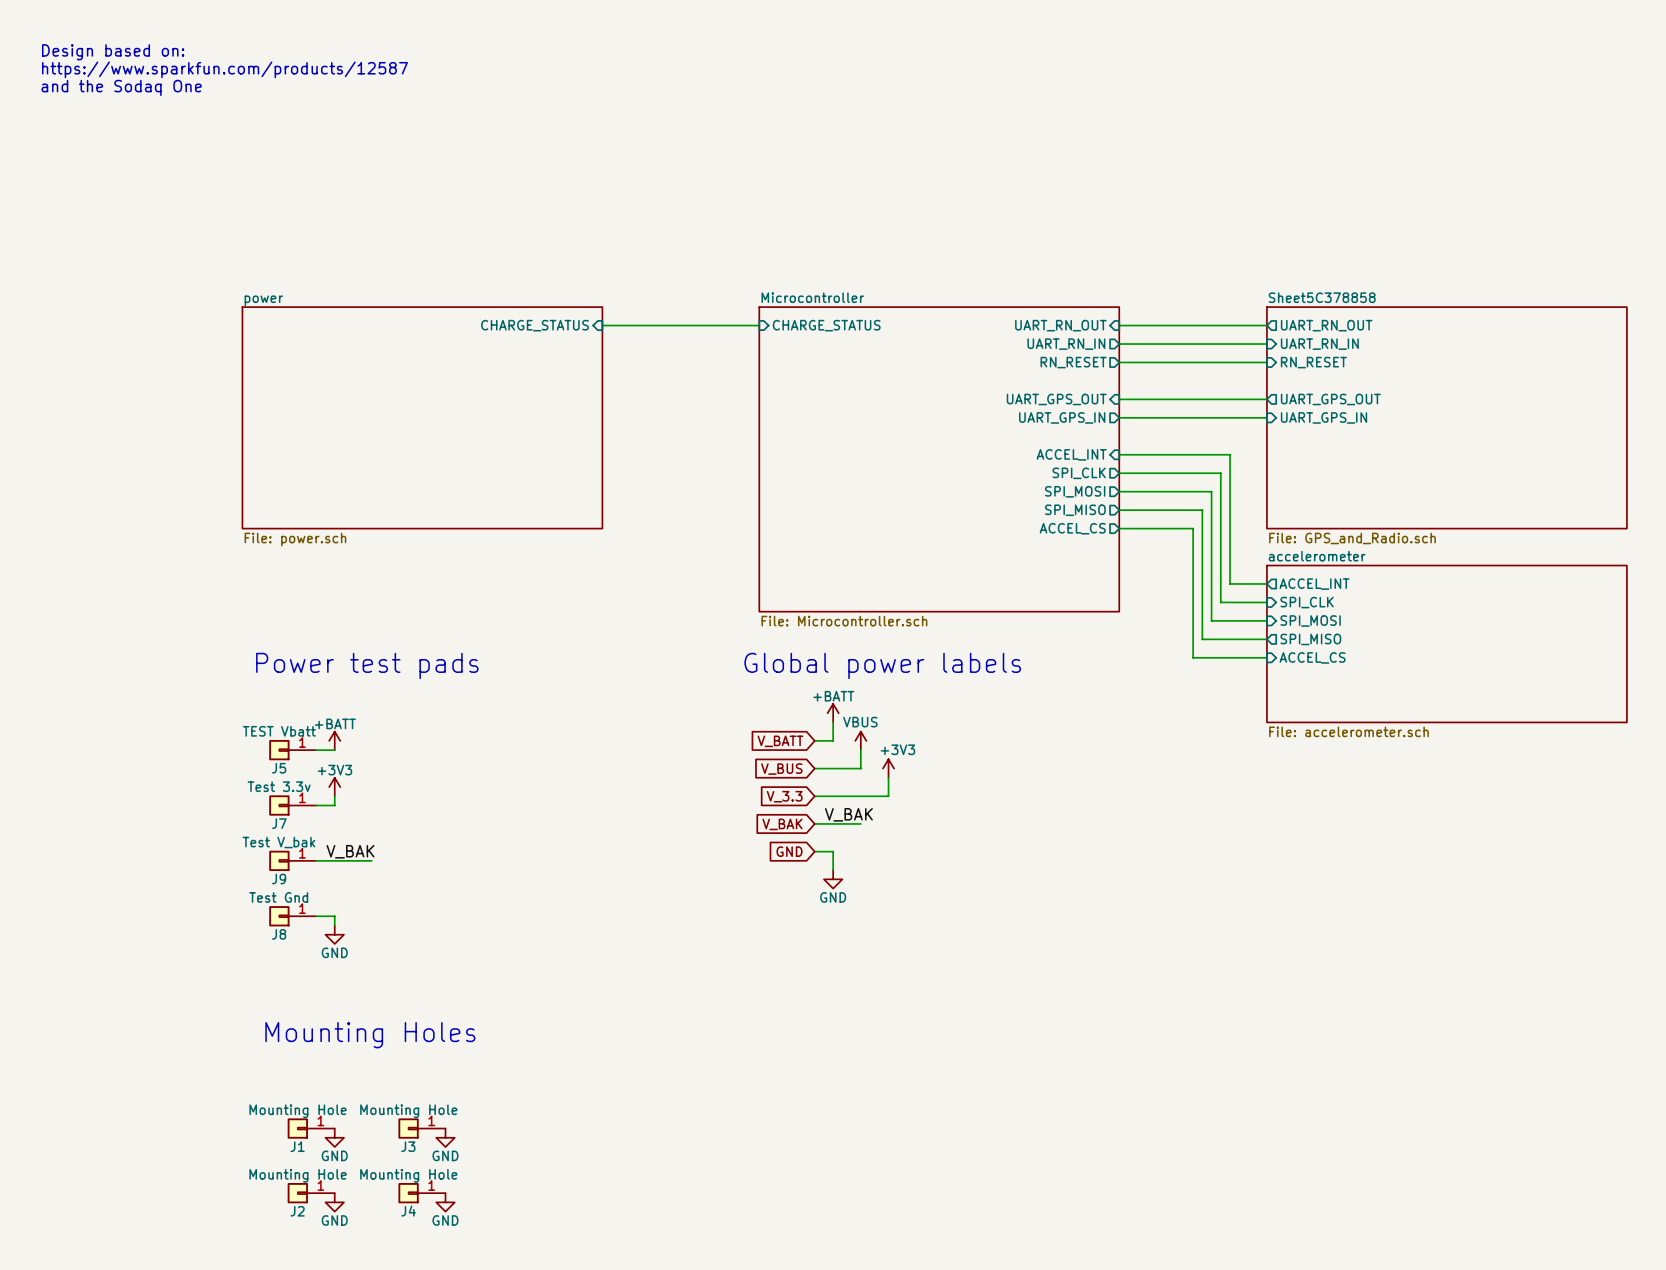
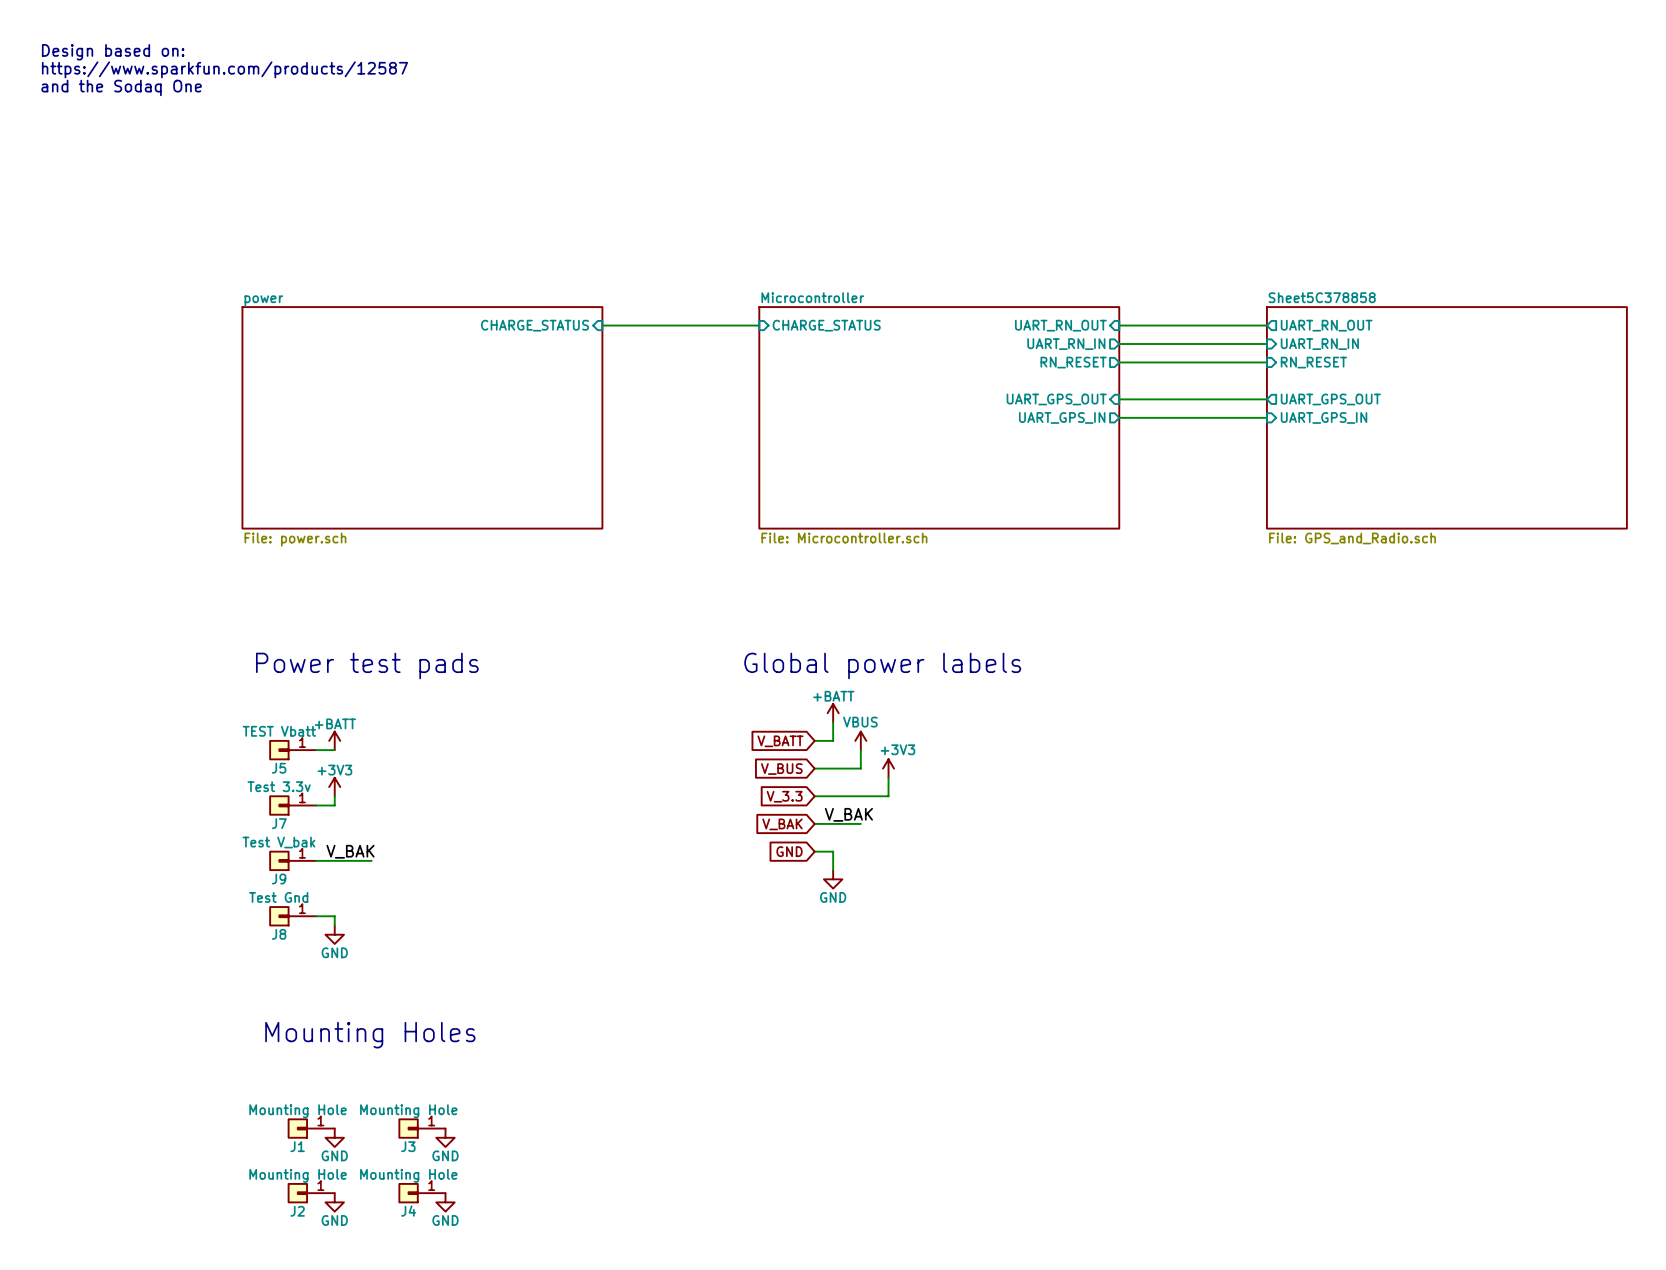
sheet Microcontroller: none -> File: Microcontroller.sch (939, 417)
sheet pin: ACCEL_INT (1071, 454) -> none
wire: (1119, 454) (1230, 454) (1230, 583) (1266, 583) -> none
sheet Microcontroller: File: Microcontroller.sch (939, 459) -> none
sheet pin: SPI_CLK (1079, 473) -> none
wire: (1119, 473) (1220, 473) (1220, 602) (1266, 602) -> none
sheet pin: SPI_MOSI (1075, 491) -> none
wire: (1119, 491) (1211, 491) (1211, 620) (1266, 620) -> none
sheet pin: SPI_MISO (1075, 510) -> none
wire: (1119, 510) (1202, 510) (1202, 639) (1266, 639) -> none
sheet pin: ACCEL_CS (1072, 528) -> none
wire: (1119, 528) (1193, 528) (1193, 657) (1266, 657) -> none
sheet pin: ACCEL_INT (1314, 584) -> none
sheet pin: SPI_CLK (1307, 602) -> none
sheet pin: SPI_MOSI (1310, 621) -> none
sheet pin: SPI_MISO (1310, 639) -> none
sheet accelerometer: File: accelerometer.sch (1446, 643) -> none
sheet pin: ACCEL_CS (1312, 657) -> none

